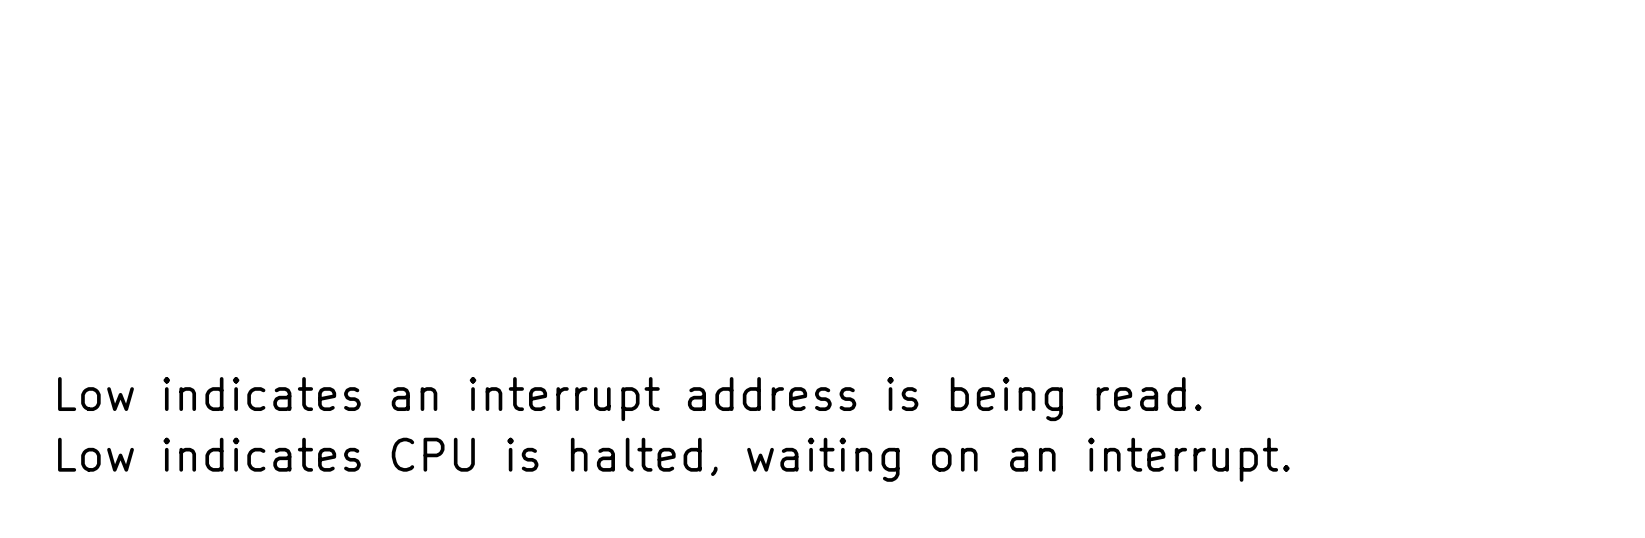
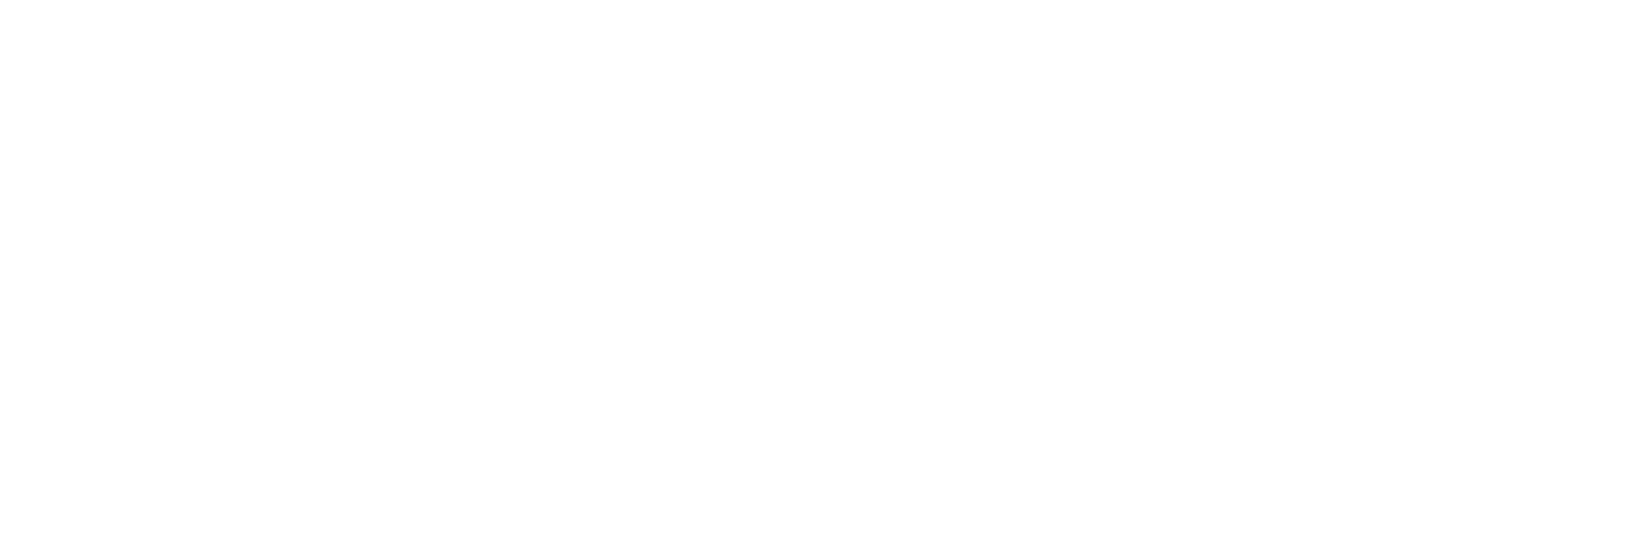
text: Low indicates an interrupt address is being read. (629, 399) -> none
text: Low indicates CPU is halted, waiting on an interrupt. (673, 459) -> none

